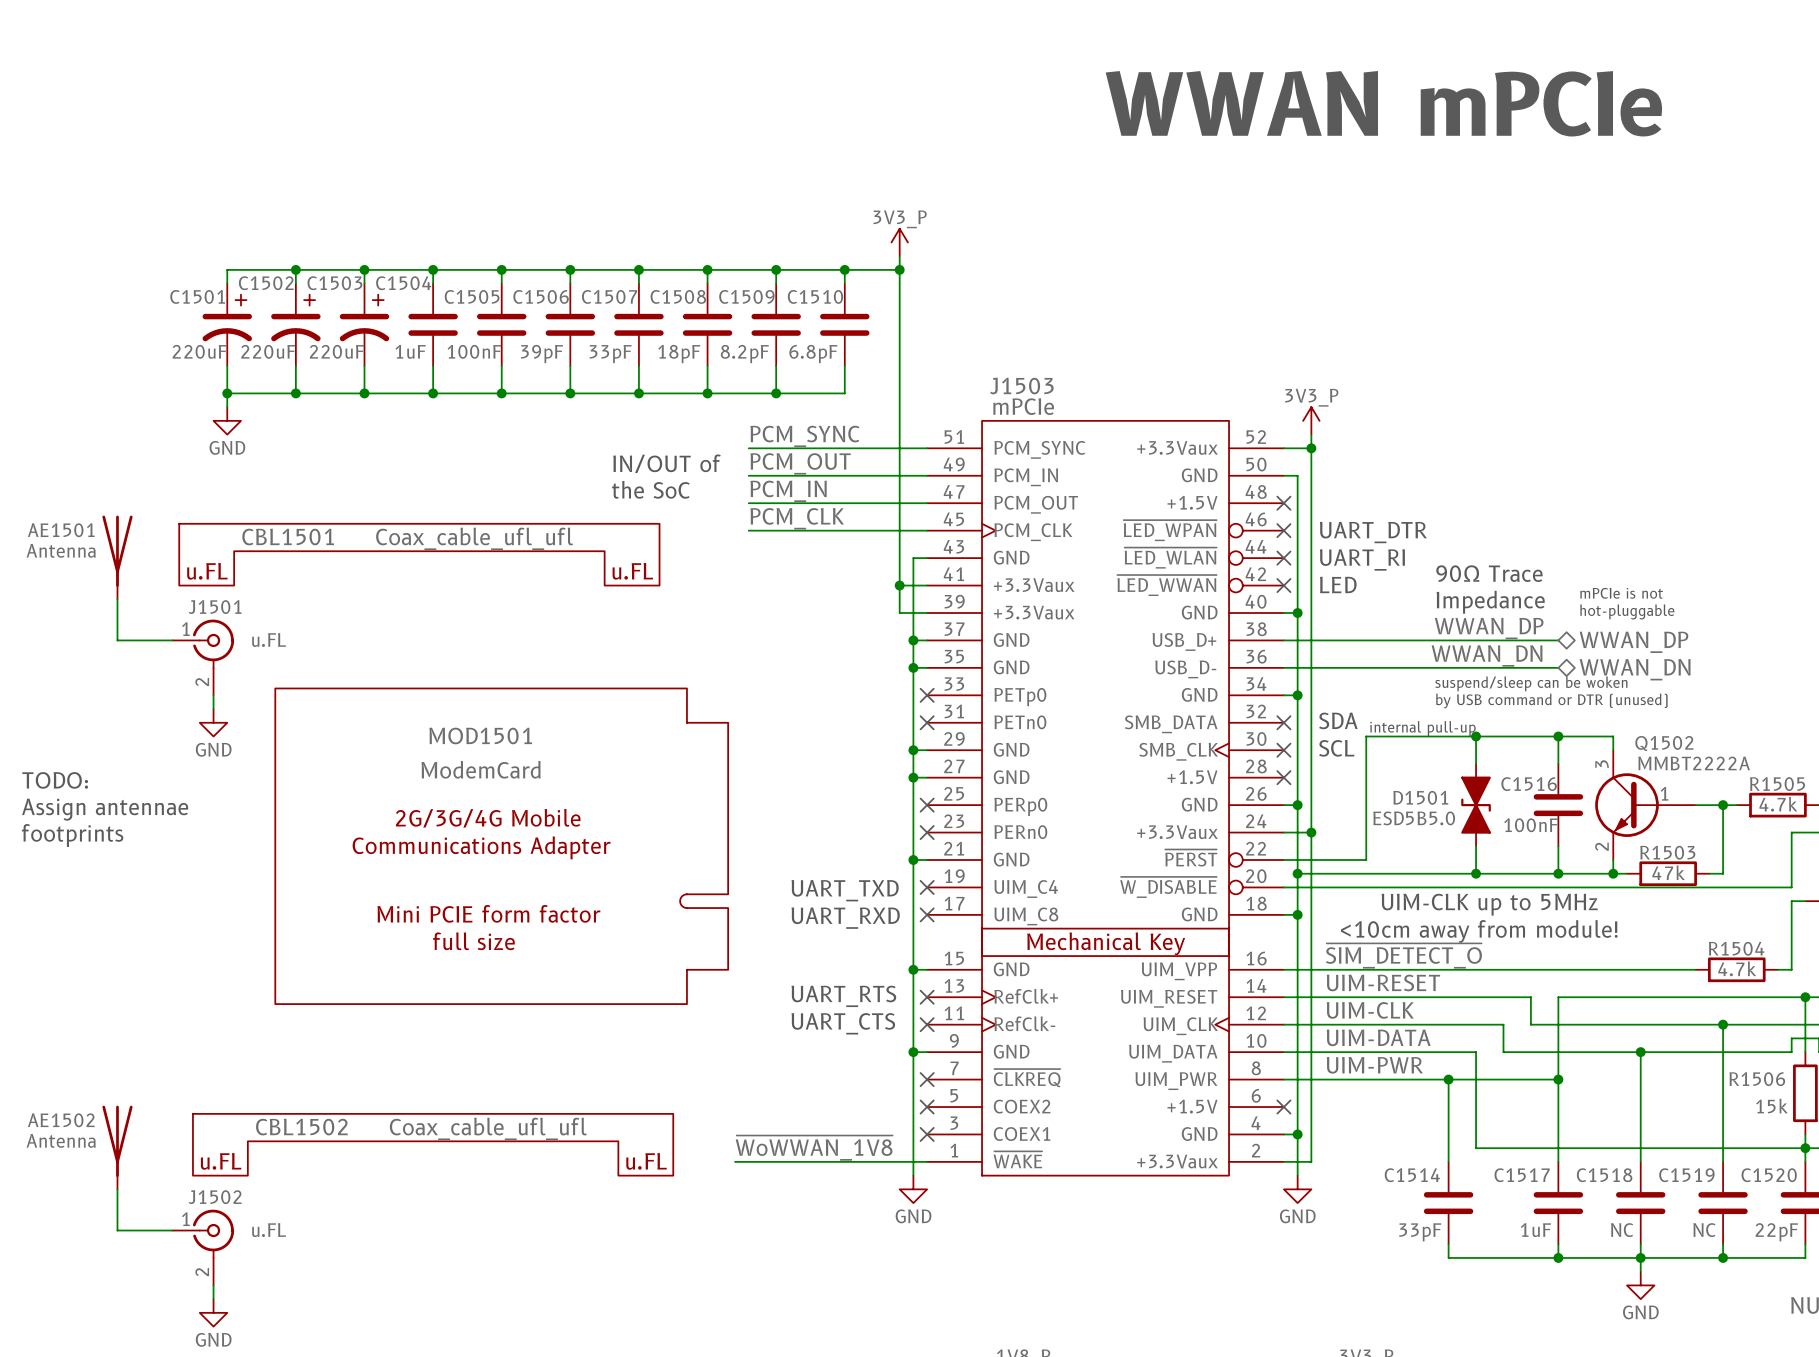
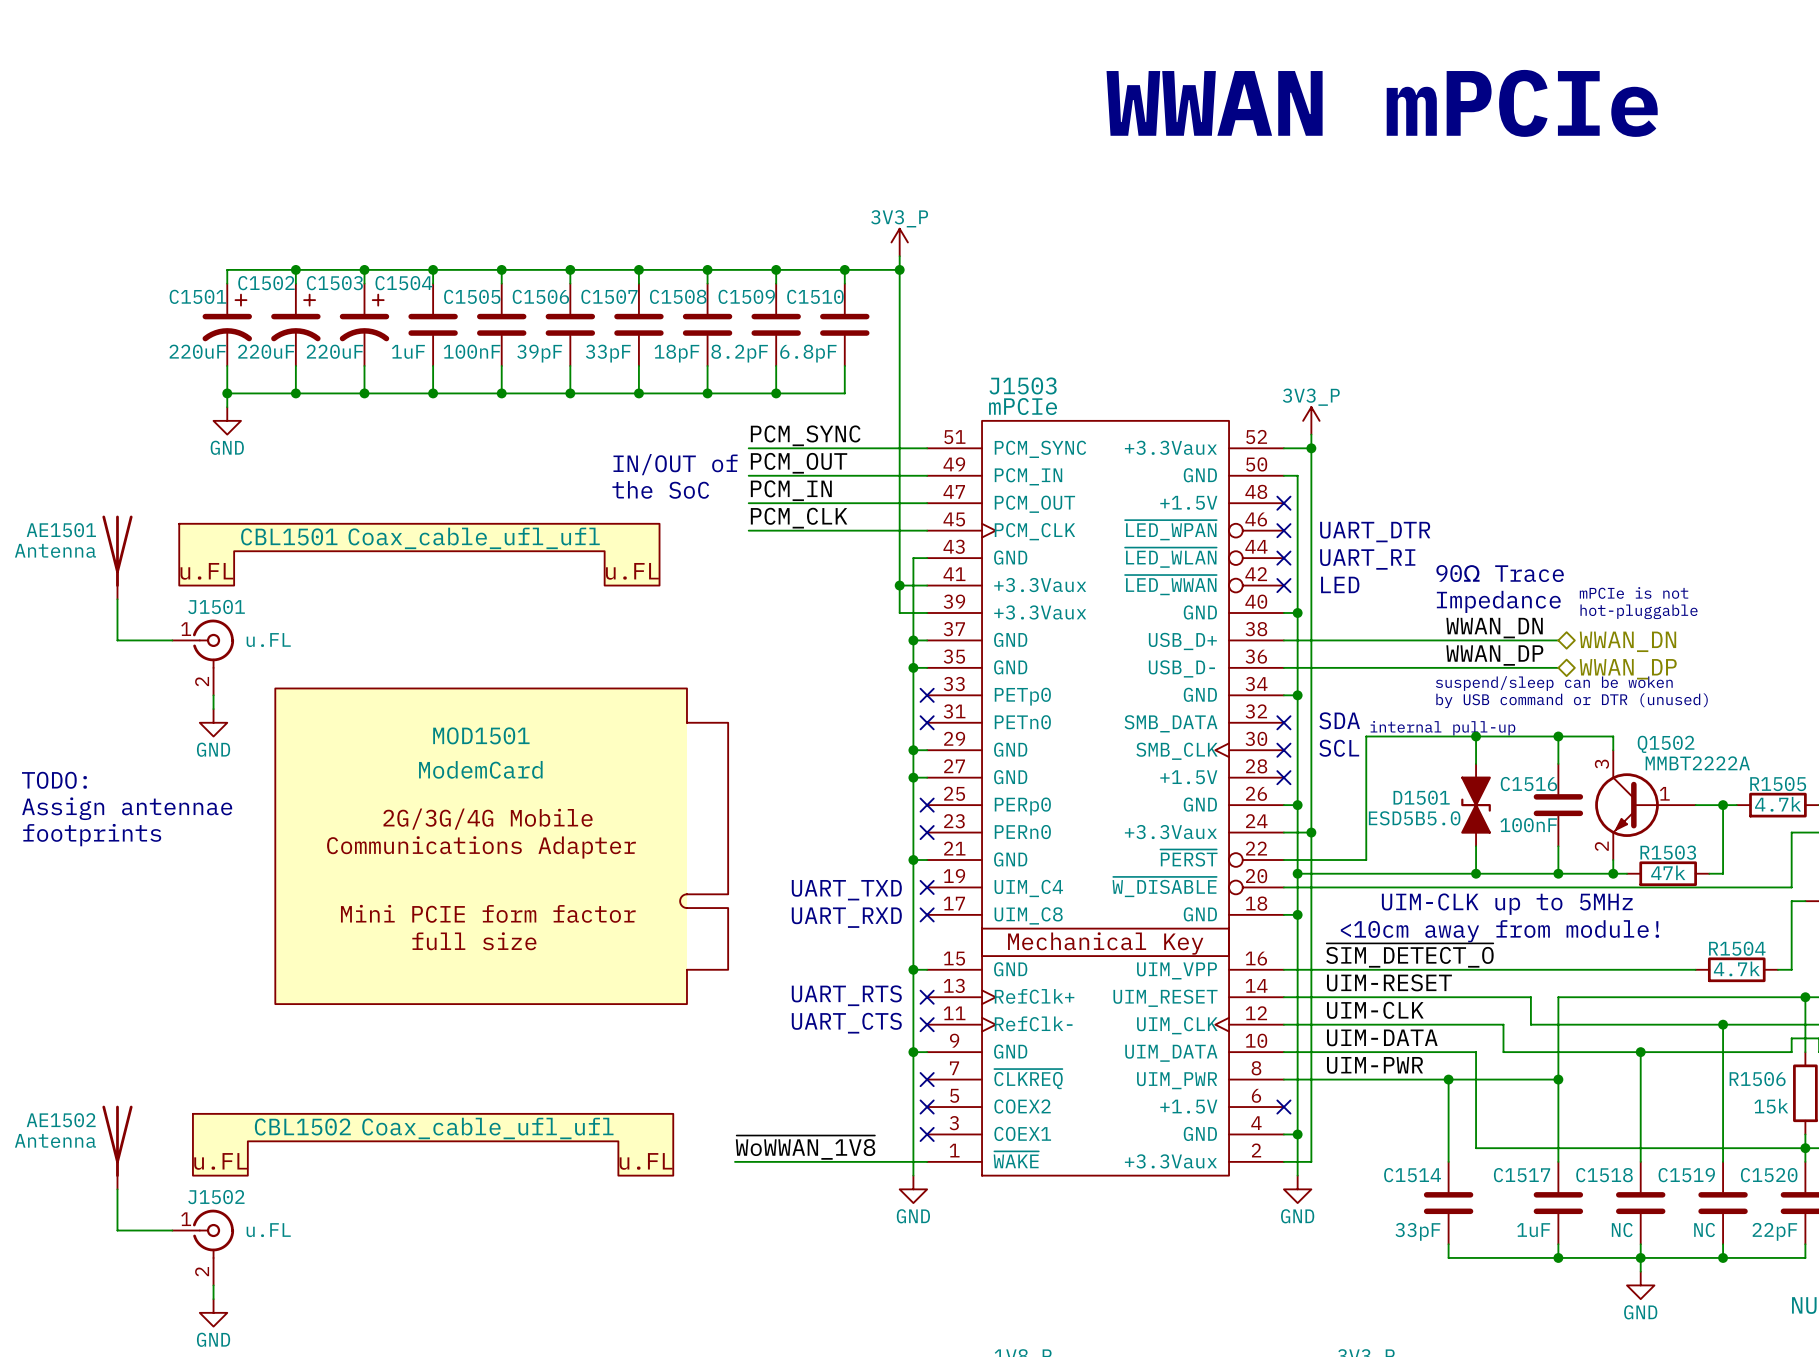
label: WWAN_DP (1489, 628) -> WWAN_DN (1494, 628)
hierarchical label: WWAN_DP (1633, 642) -> WWAN_DN (1627, 641)
label: WWAN_DN (1487, 655) -> WWAN_DP (1494, 655)
hierarchical label: WWAN_DN (1635, 669) -> WWAN_DP (1628, 669)

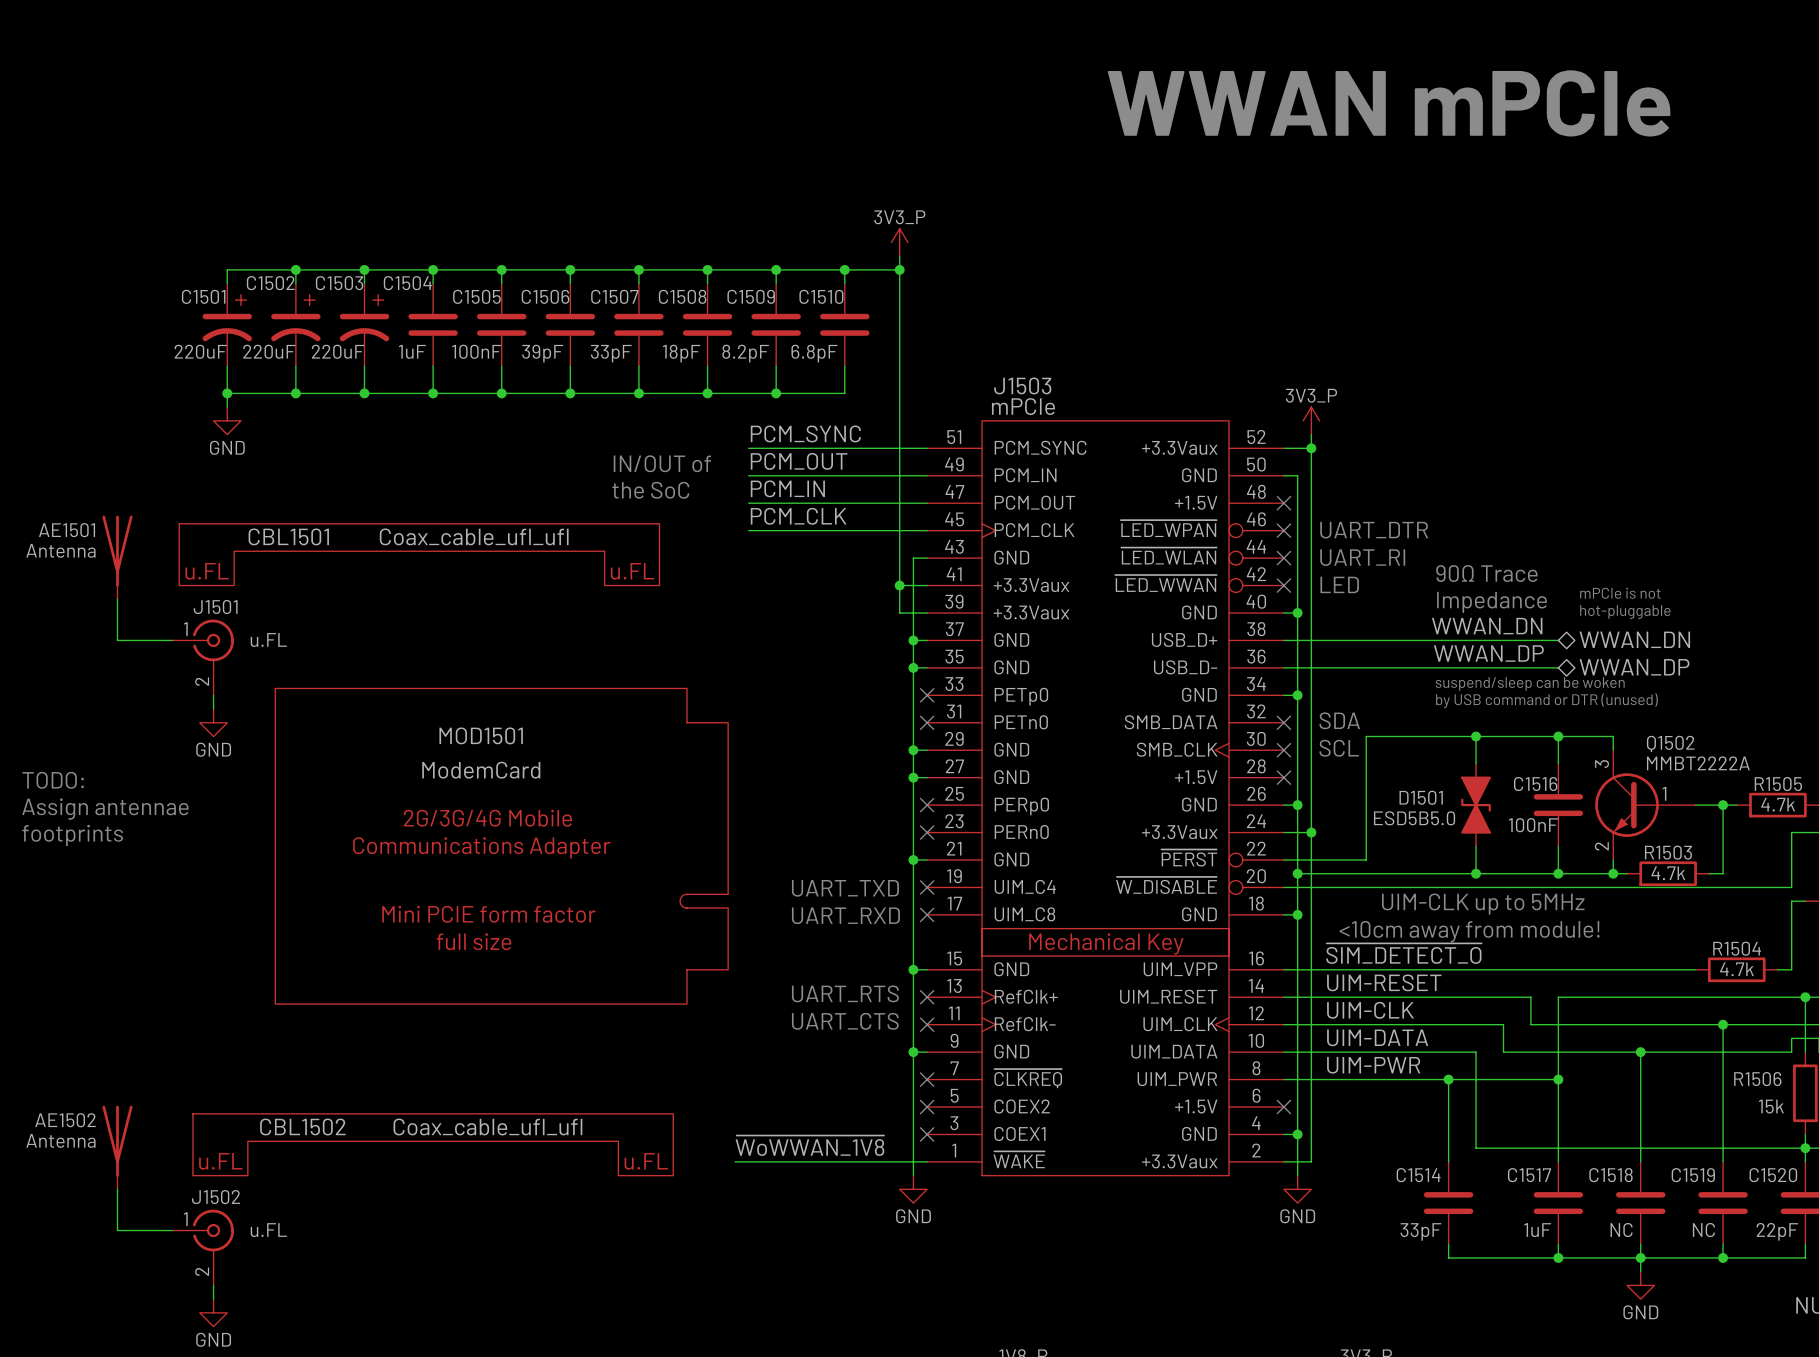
text: internal pull-up (1442, 728) -> none
R1503 value: 47k (1668, 872) -> 4.7k (1668, 873)

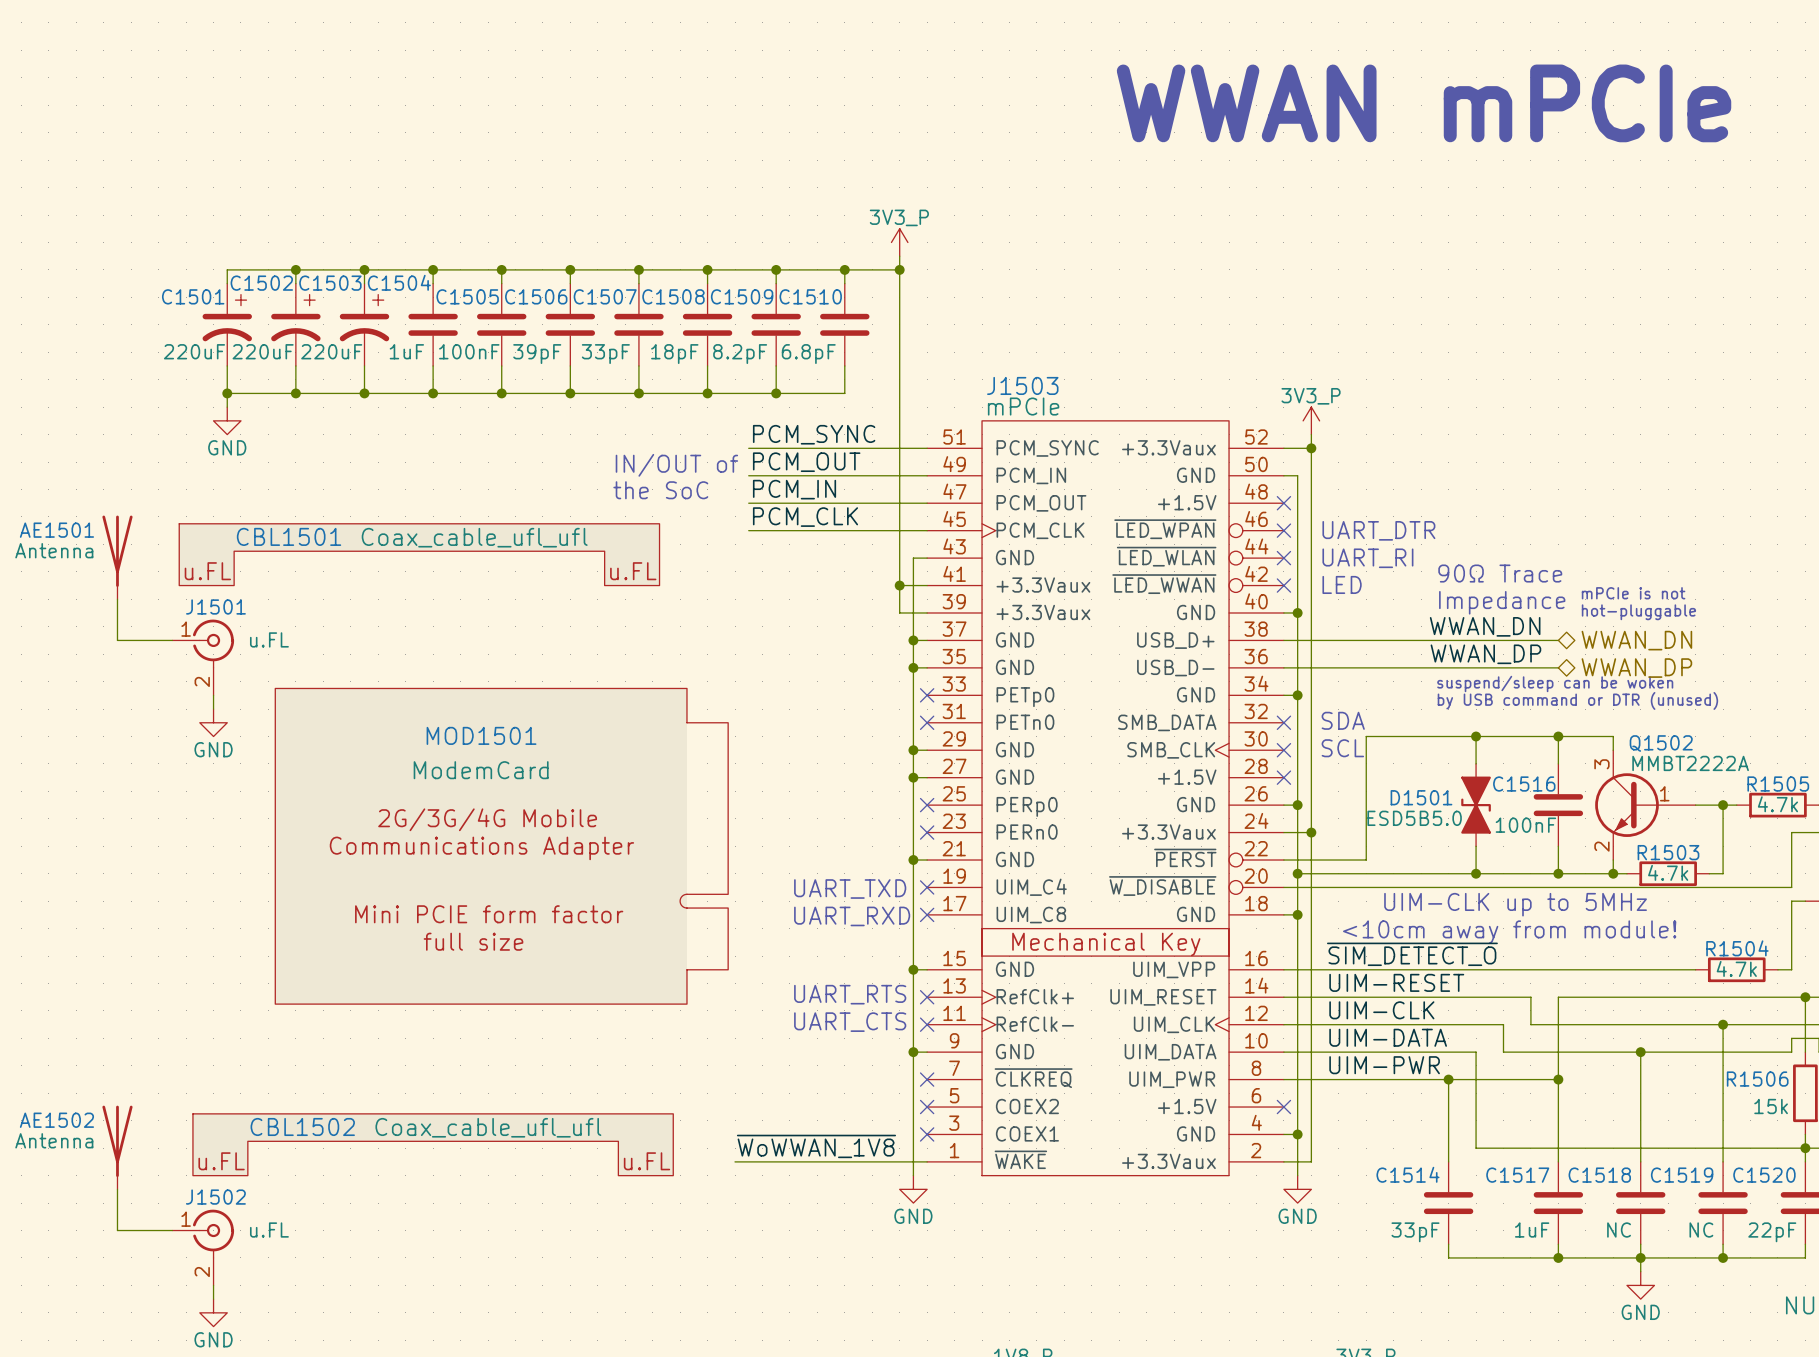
text: TODO: (53, 780) -> none
text: Assign antennae (105, 809) -> none
text: footprints (72, 835) -> none

